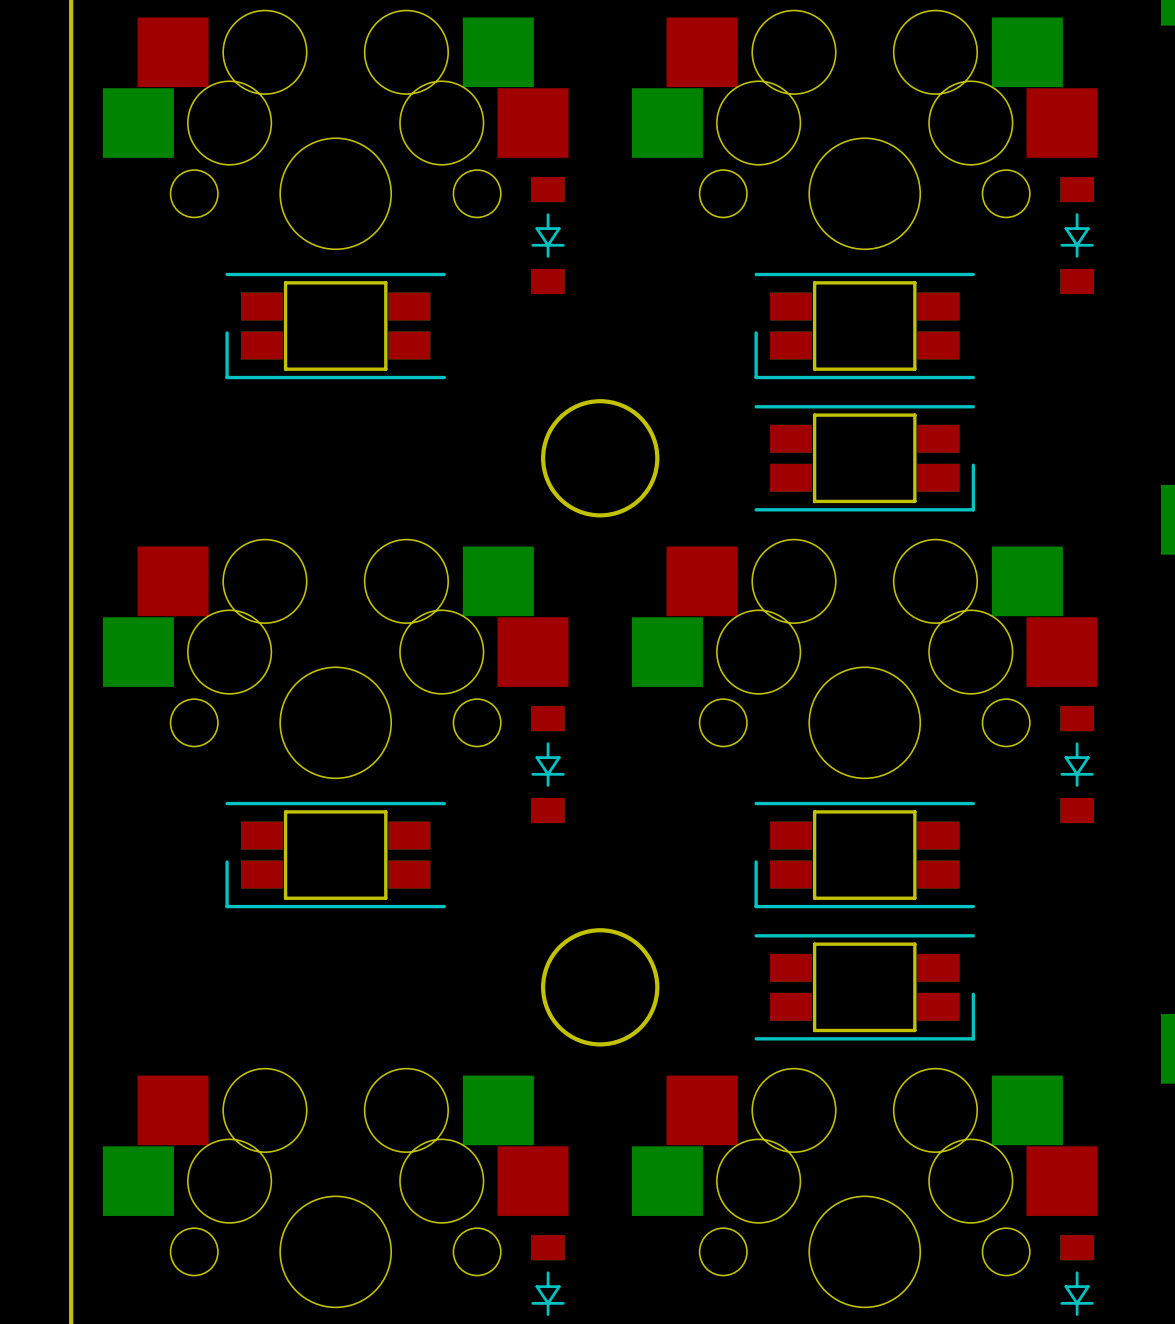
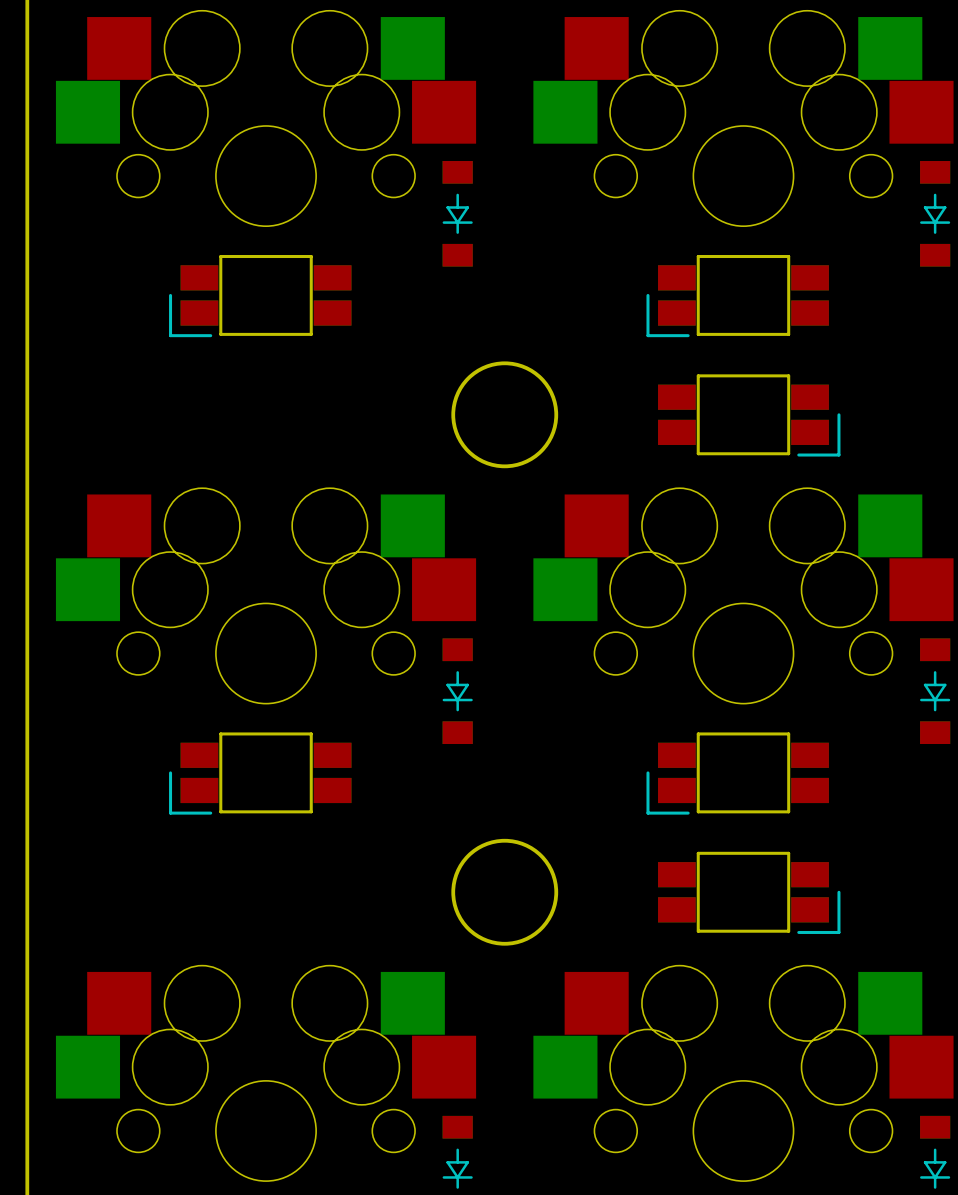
part footprint: [225, 272, 446, 380] -> [169, 254, 352, 338]
part footprint: [754, 272, 975, 380] -> [646, 254, 829, 338]
part footprint: [754, 405, 975, 512] -> [658, 374, 841, 457]
part footprint: [225, 801, 446, 909] -> [169, 732, 352, 815]
part footprint: [754, 801, 975, 909] -> [646, 732, 829, 815]
part footprint: [754, 934, 975, 1041] -> [658, 851, 841, 934]

